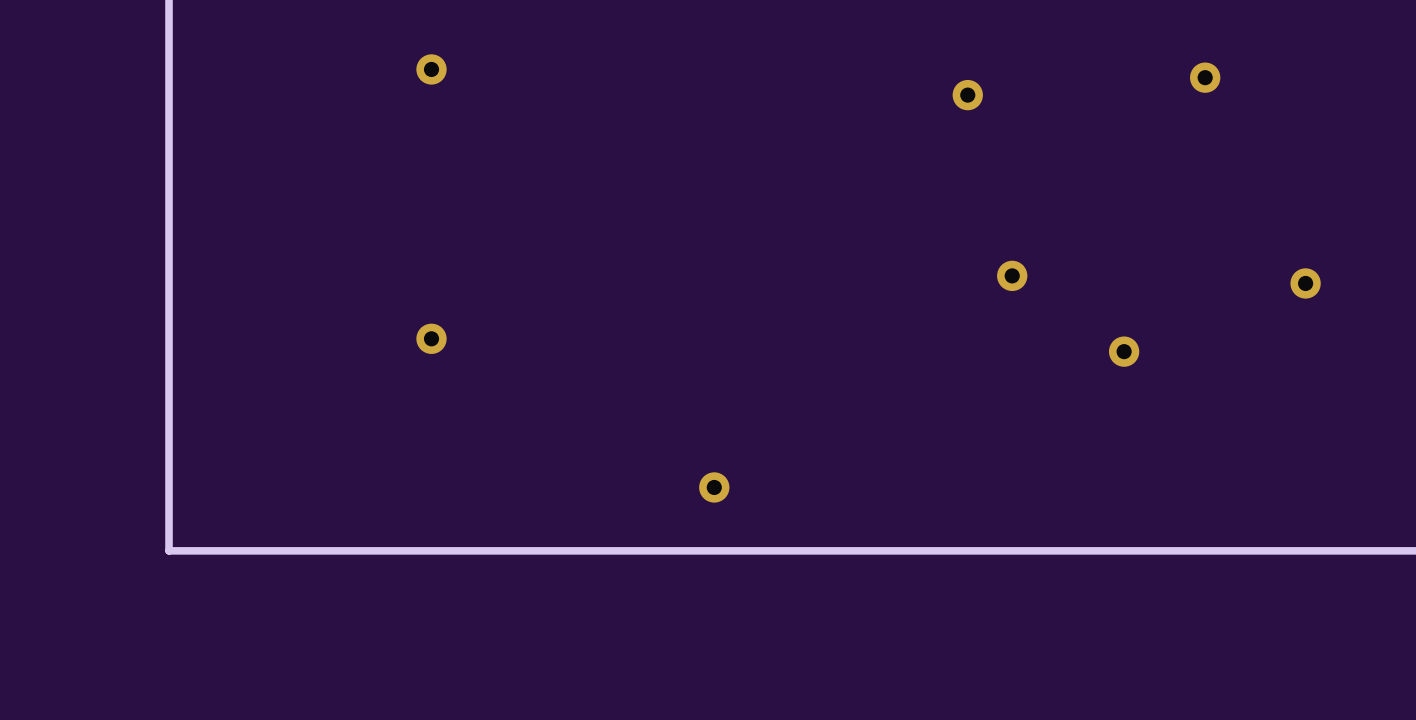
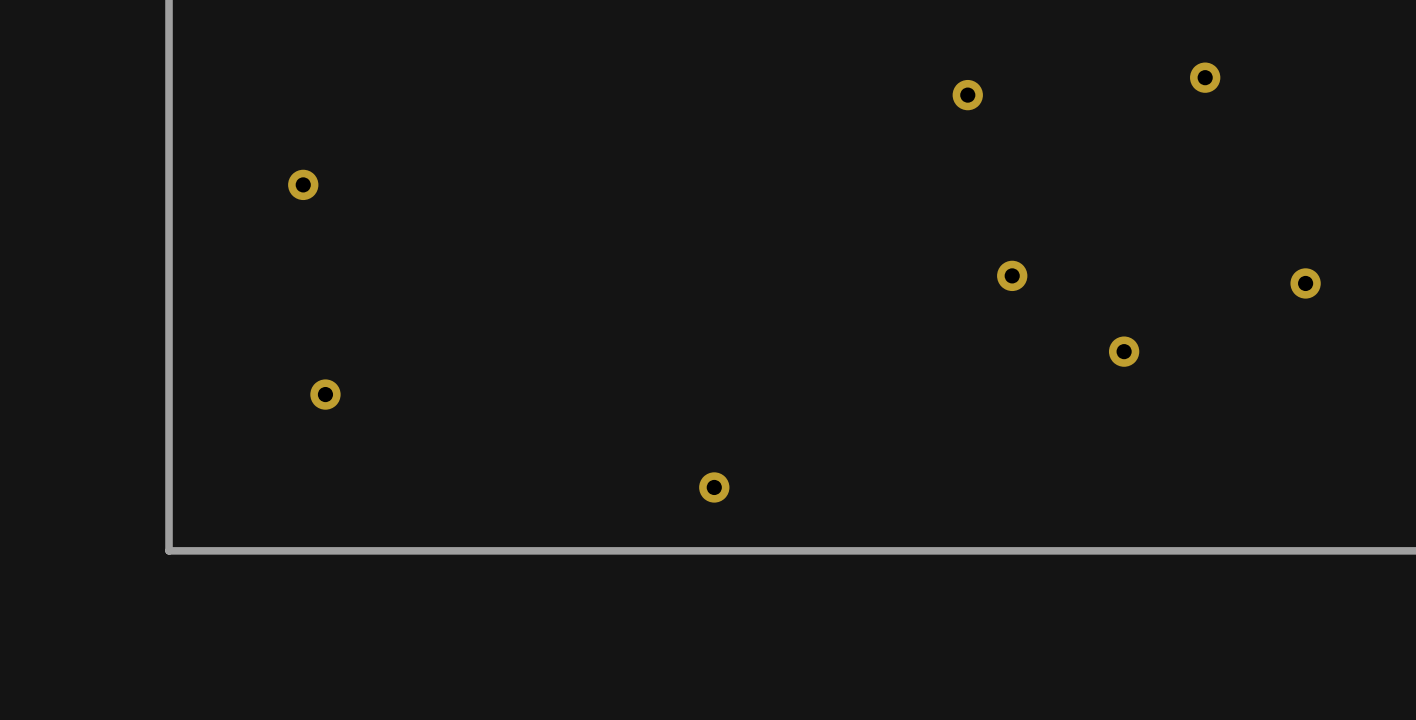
via: (431, 69) -> none
via: none -> (303, 184)
via: (431, 338) -> none
via: none -> (325, 394)

